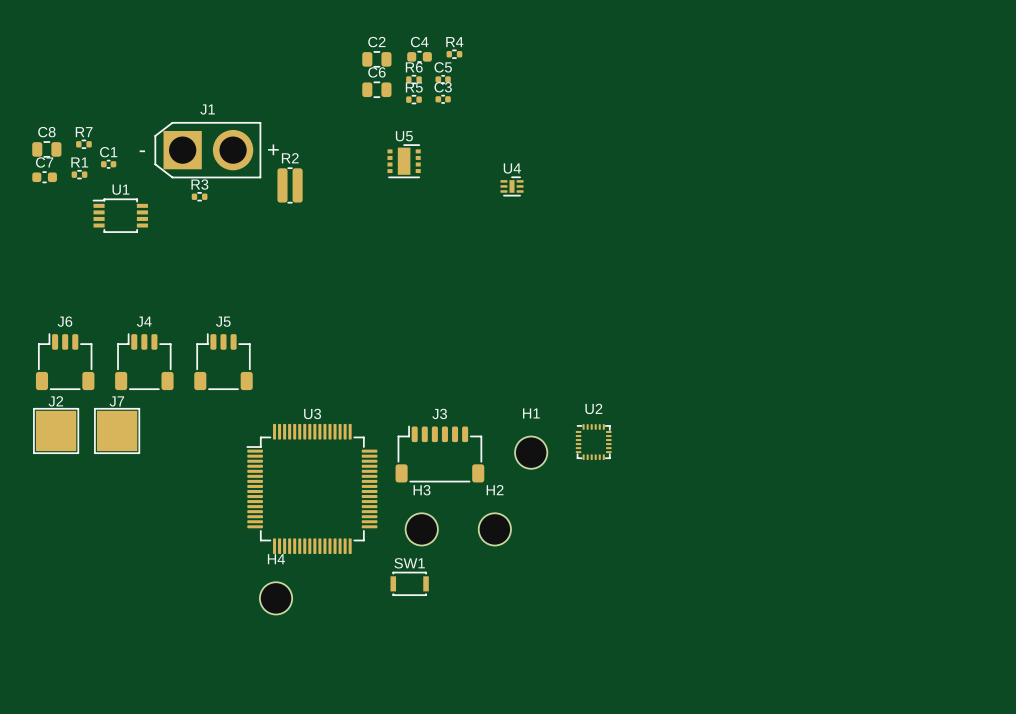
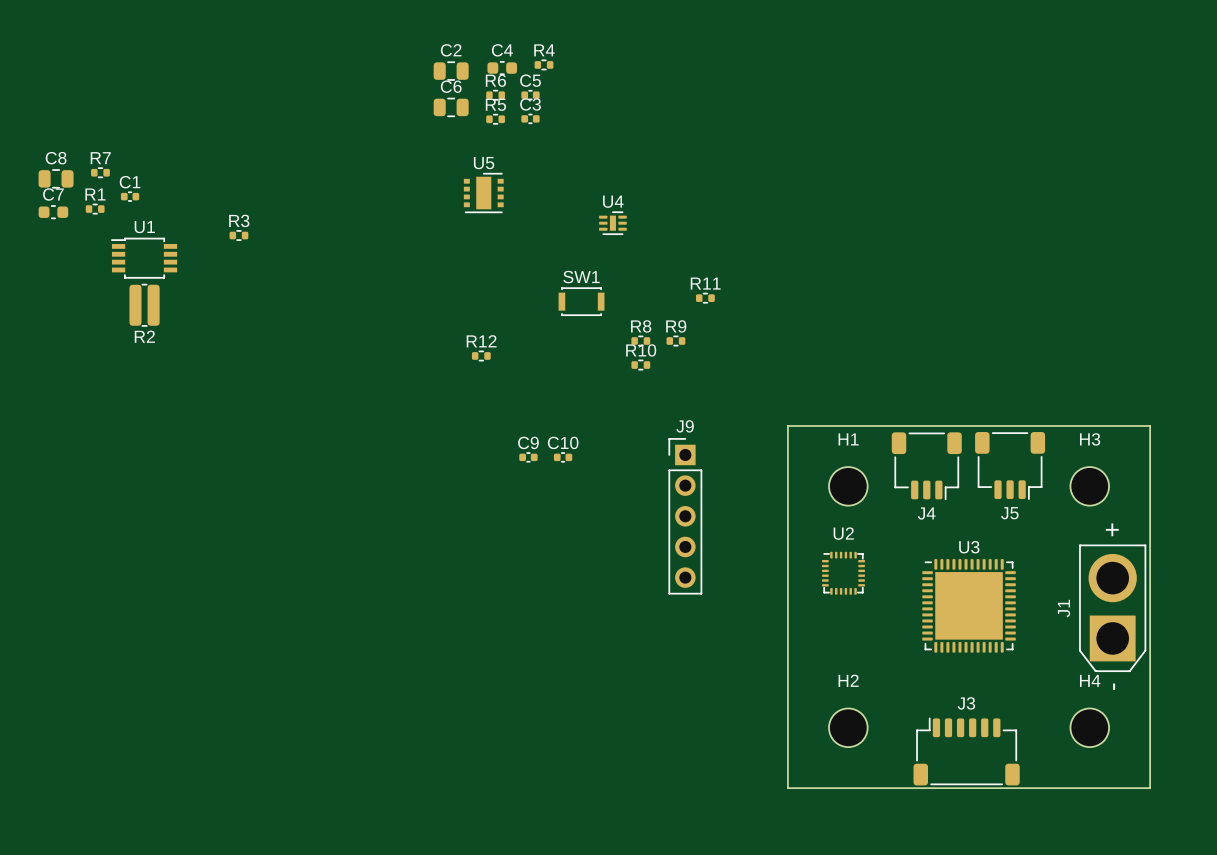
J1 rotation: 0° (207, 150) -> 90° counterclockwise (1112, 608)
J1 position: (207, 150) -> (1112, 608)
R2 name position: R2 (290, 158) -> R2 (144, 336)
R2 position: (290, 185) -> (144, 305)
R11: none -> (705, 298)
R8: none -> (640, 341)
R9: none -> (675, 341)
R12: none -> (481, 355)
R10: none -> (640, 365)
board edge: none -> (787, 425) (1150, 425) (1150, 788) (787, 788) (787, 425)
J6: (65, 361) -> none
J4 rotation: 0° (144, 361) -> 180° (926, 466)
J4 position: (144, 361) -> (926, 466)
J5 rotation: 0° (223, 361) -> 180° (1010, 465)
J5 position: (223, 361) -> (1010, 465)
C9: none -> (528, 457)
C10: none -> (563, 457)
U3 name position: U3 (312, 413) -> U3 (969, 547)
U3 footprint: [246, 423, 378, 555] -> [922, 559, 1016, 653]
J2: (56, 430) -> none
J7: (117, 430) -> none
J9: none -> (685, 516)
U2 position: (593, 442) -> (843, 573)
H1 position: (531, 452) -> (848, 486)
J3 position: (439, 454) -> (966, 751)
H3 position: (421, 529) -> (1089, 486)
H2 position: (494, 529) -> (848, 727)
SW1 position: (409, 583) -> (581, 301)
H4 position: (276, 598) -> (1089, 727)

